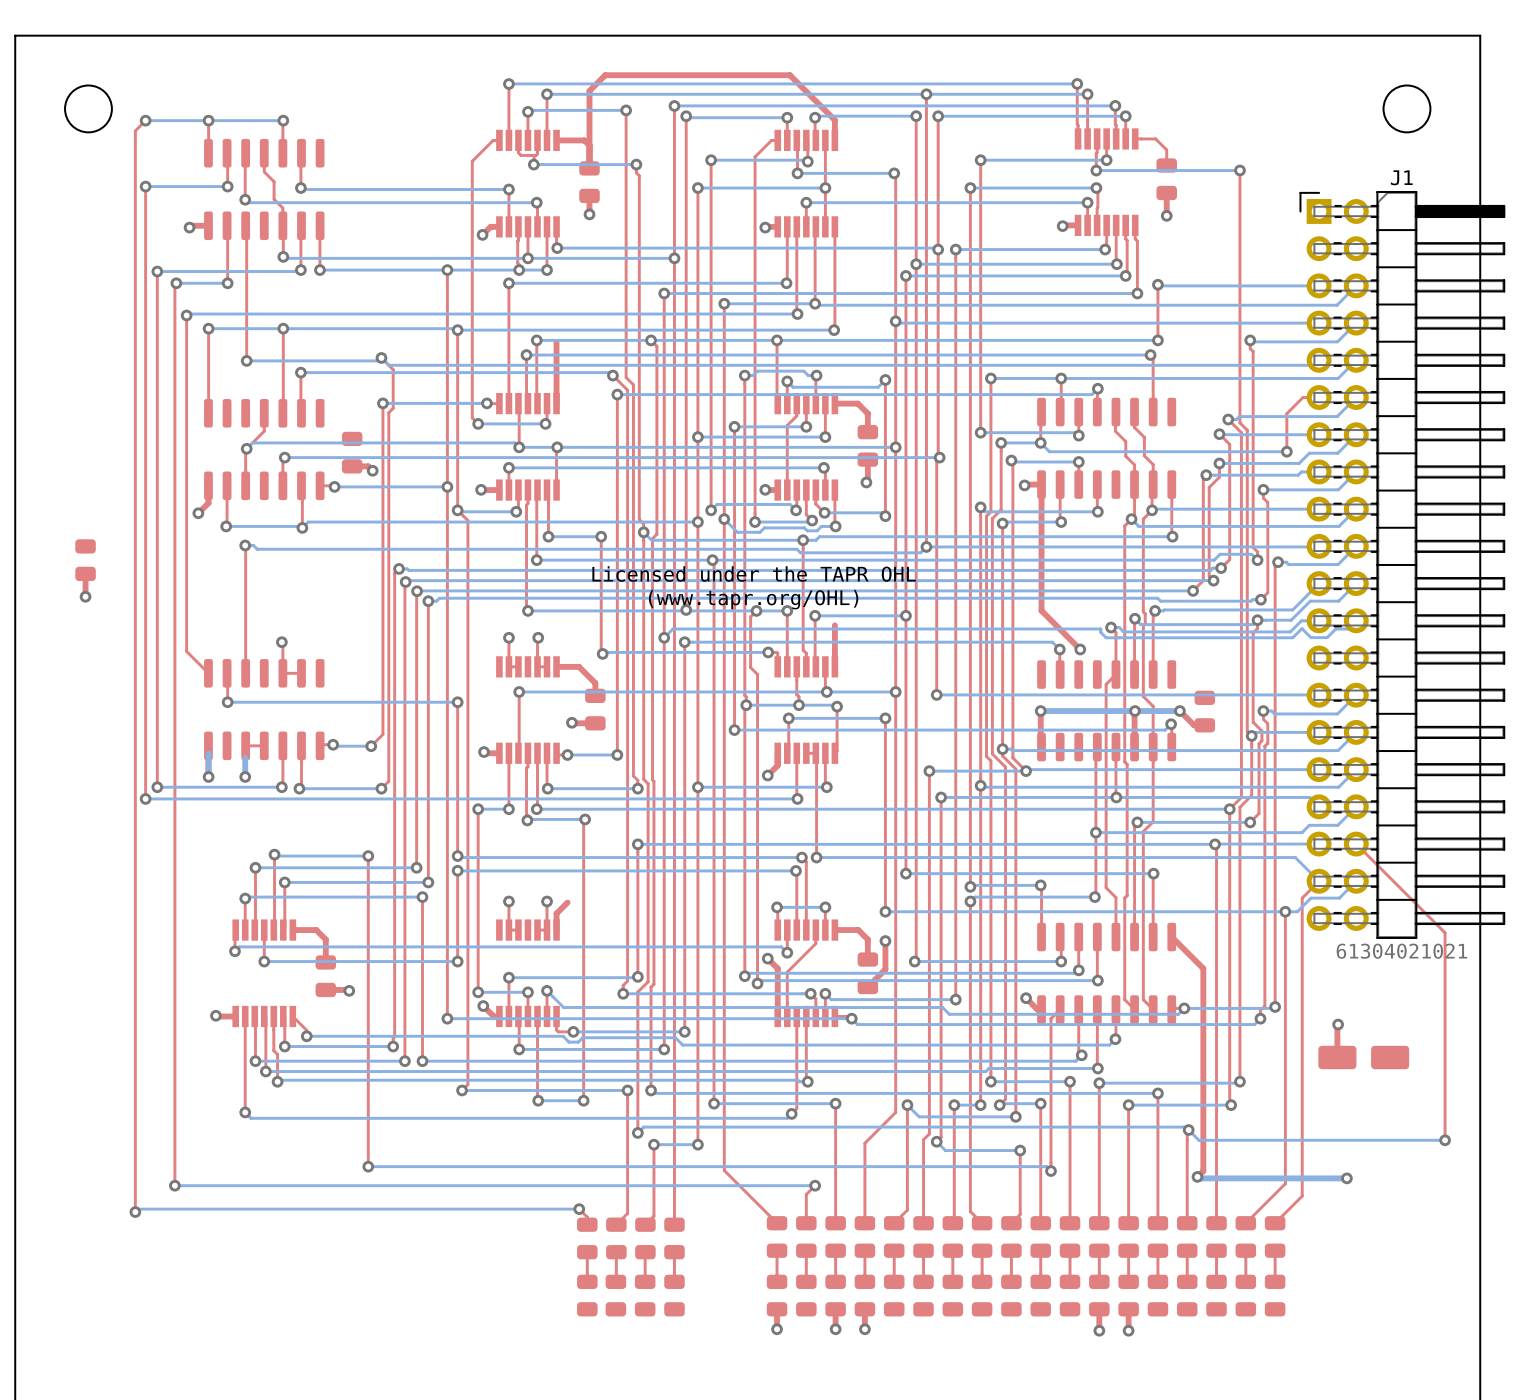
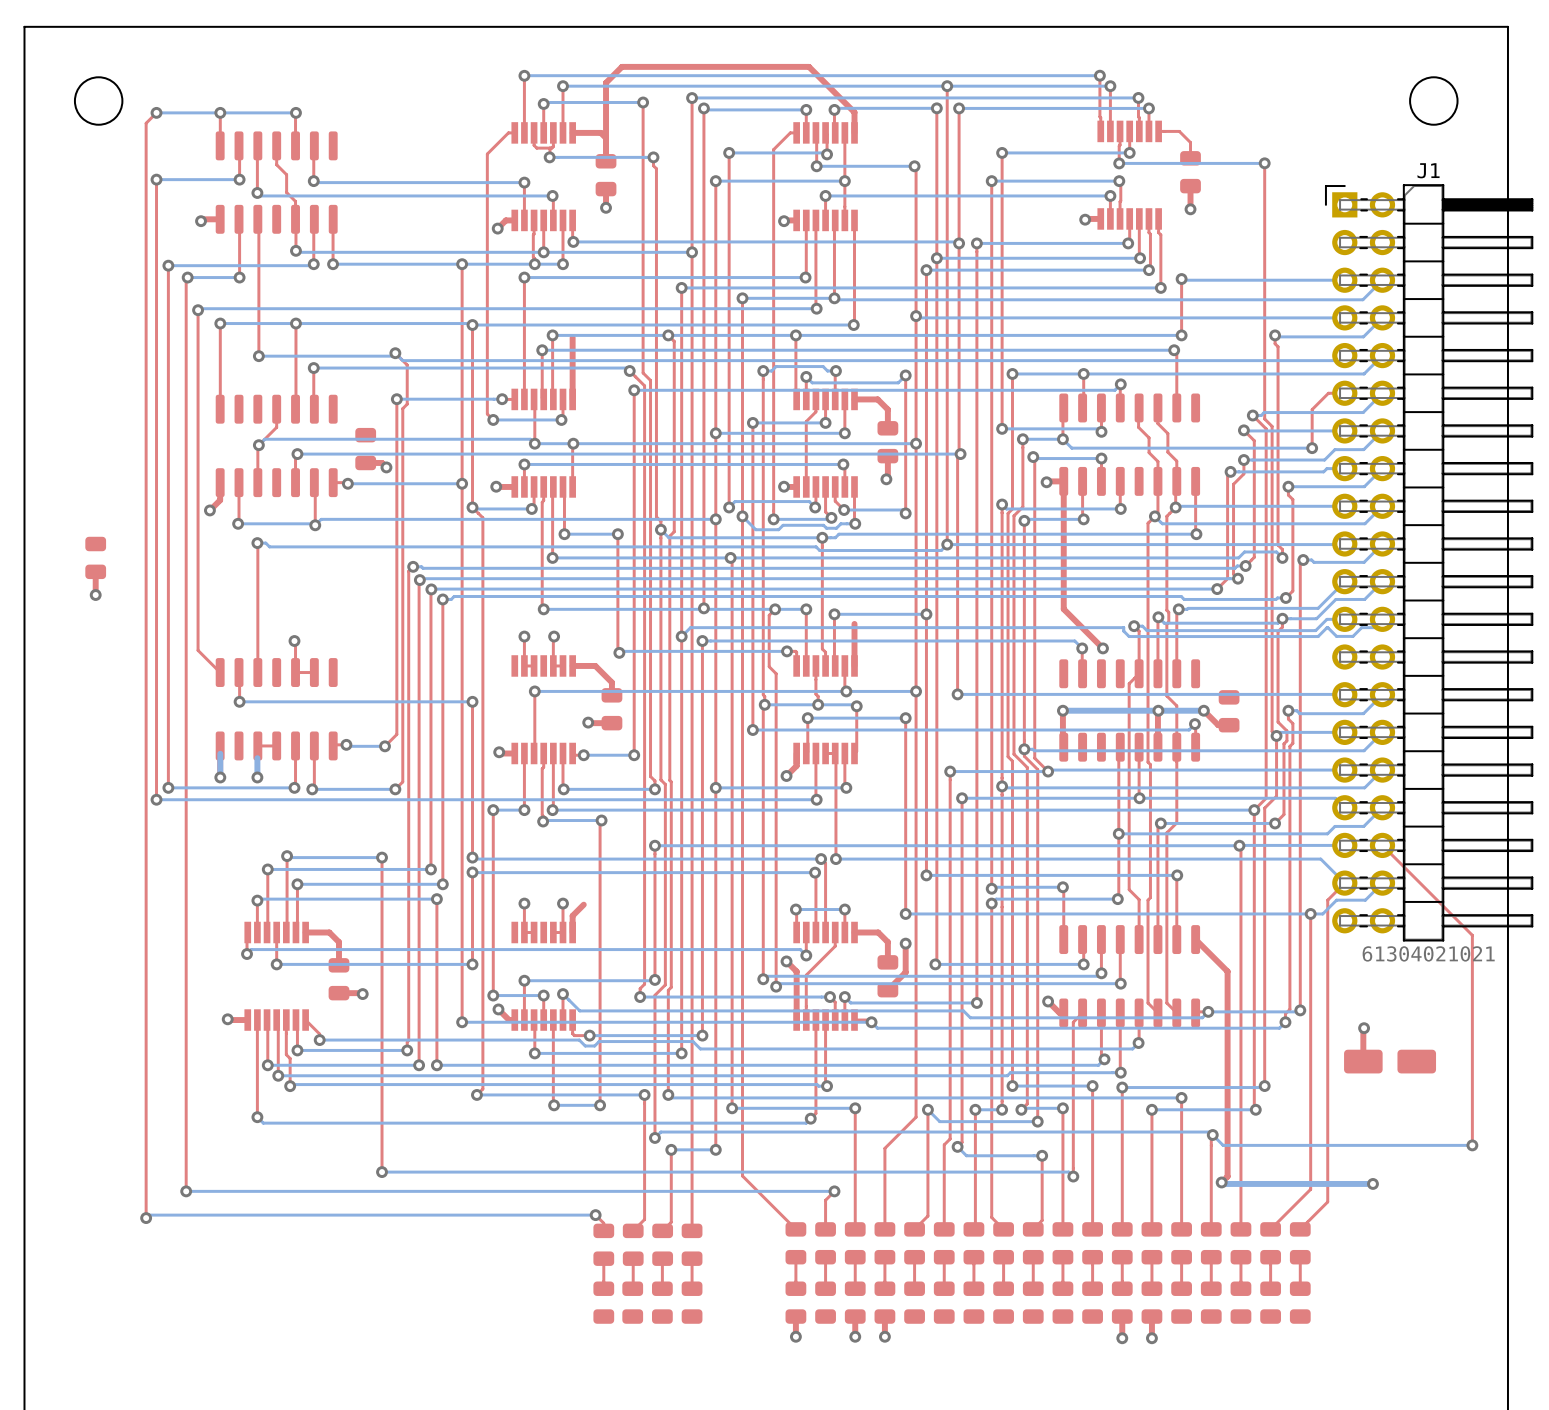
text: Licensed under the TAPR OHL (754, 574) -> none
text: (www.tapr.org/OHL) (753, 599) -> none

